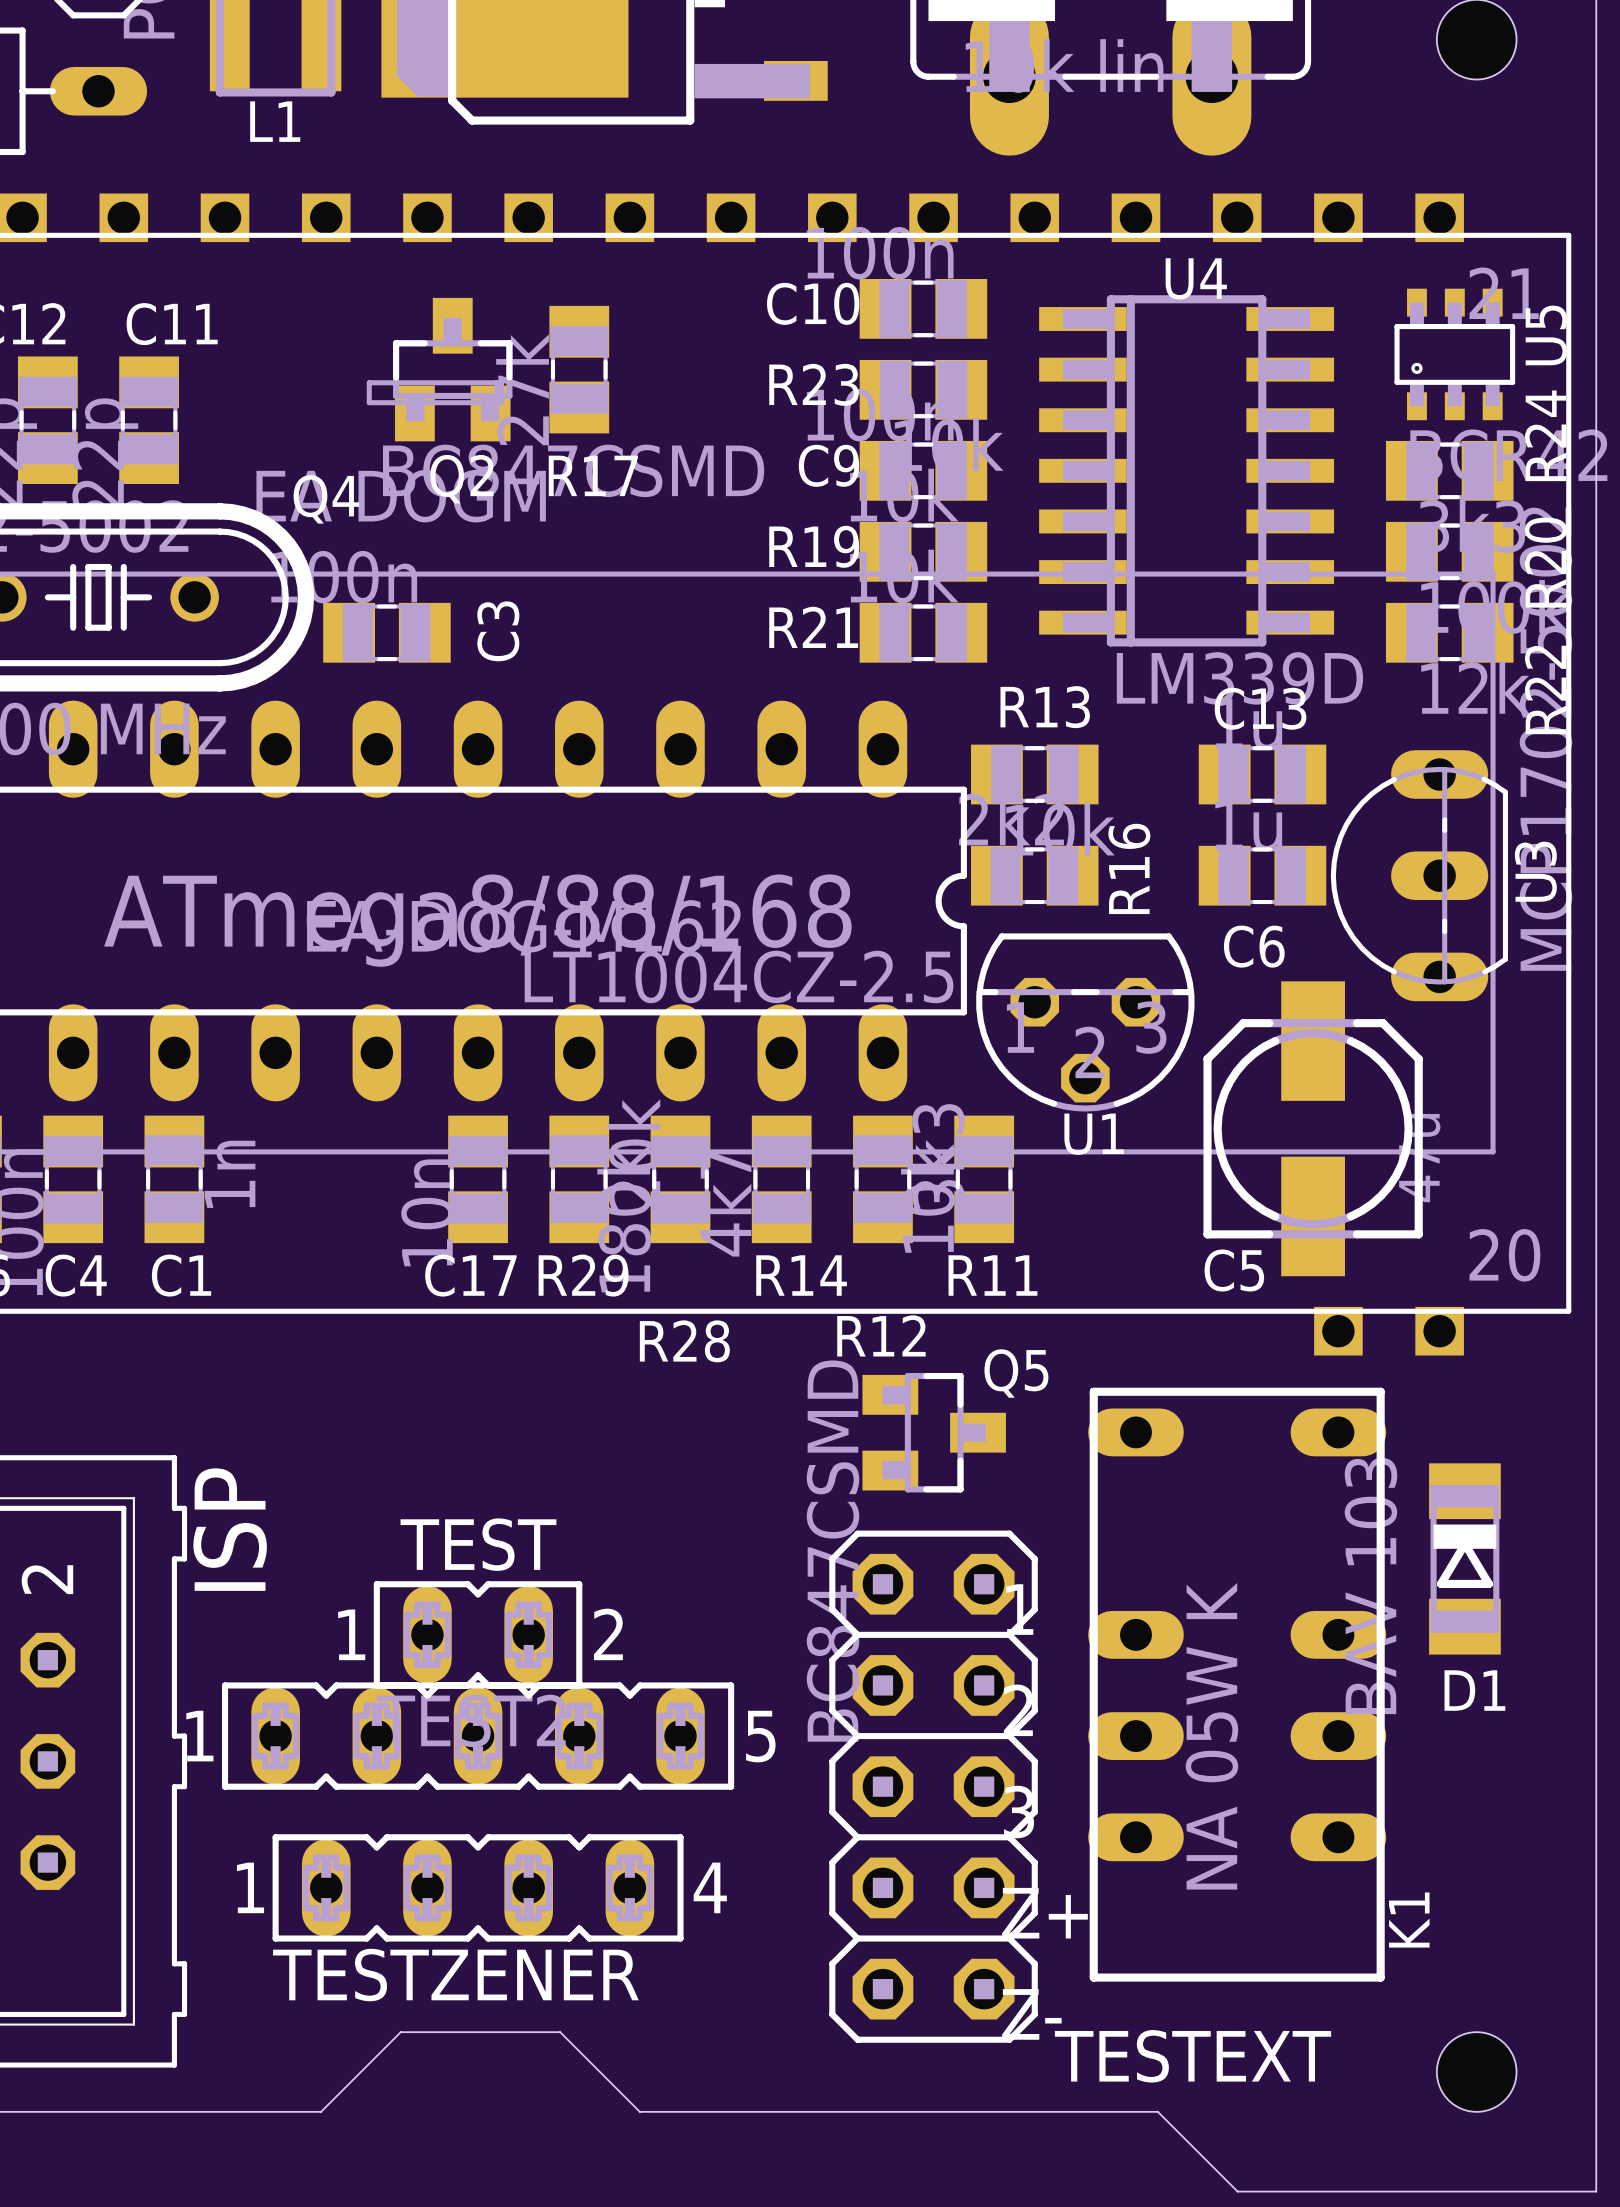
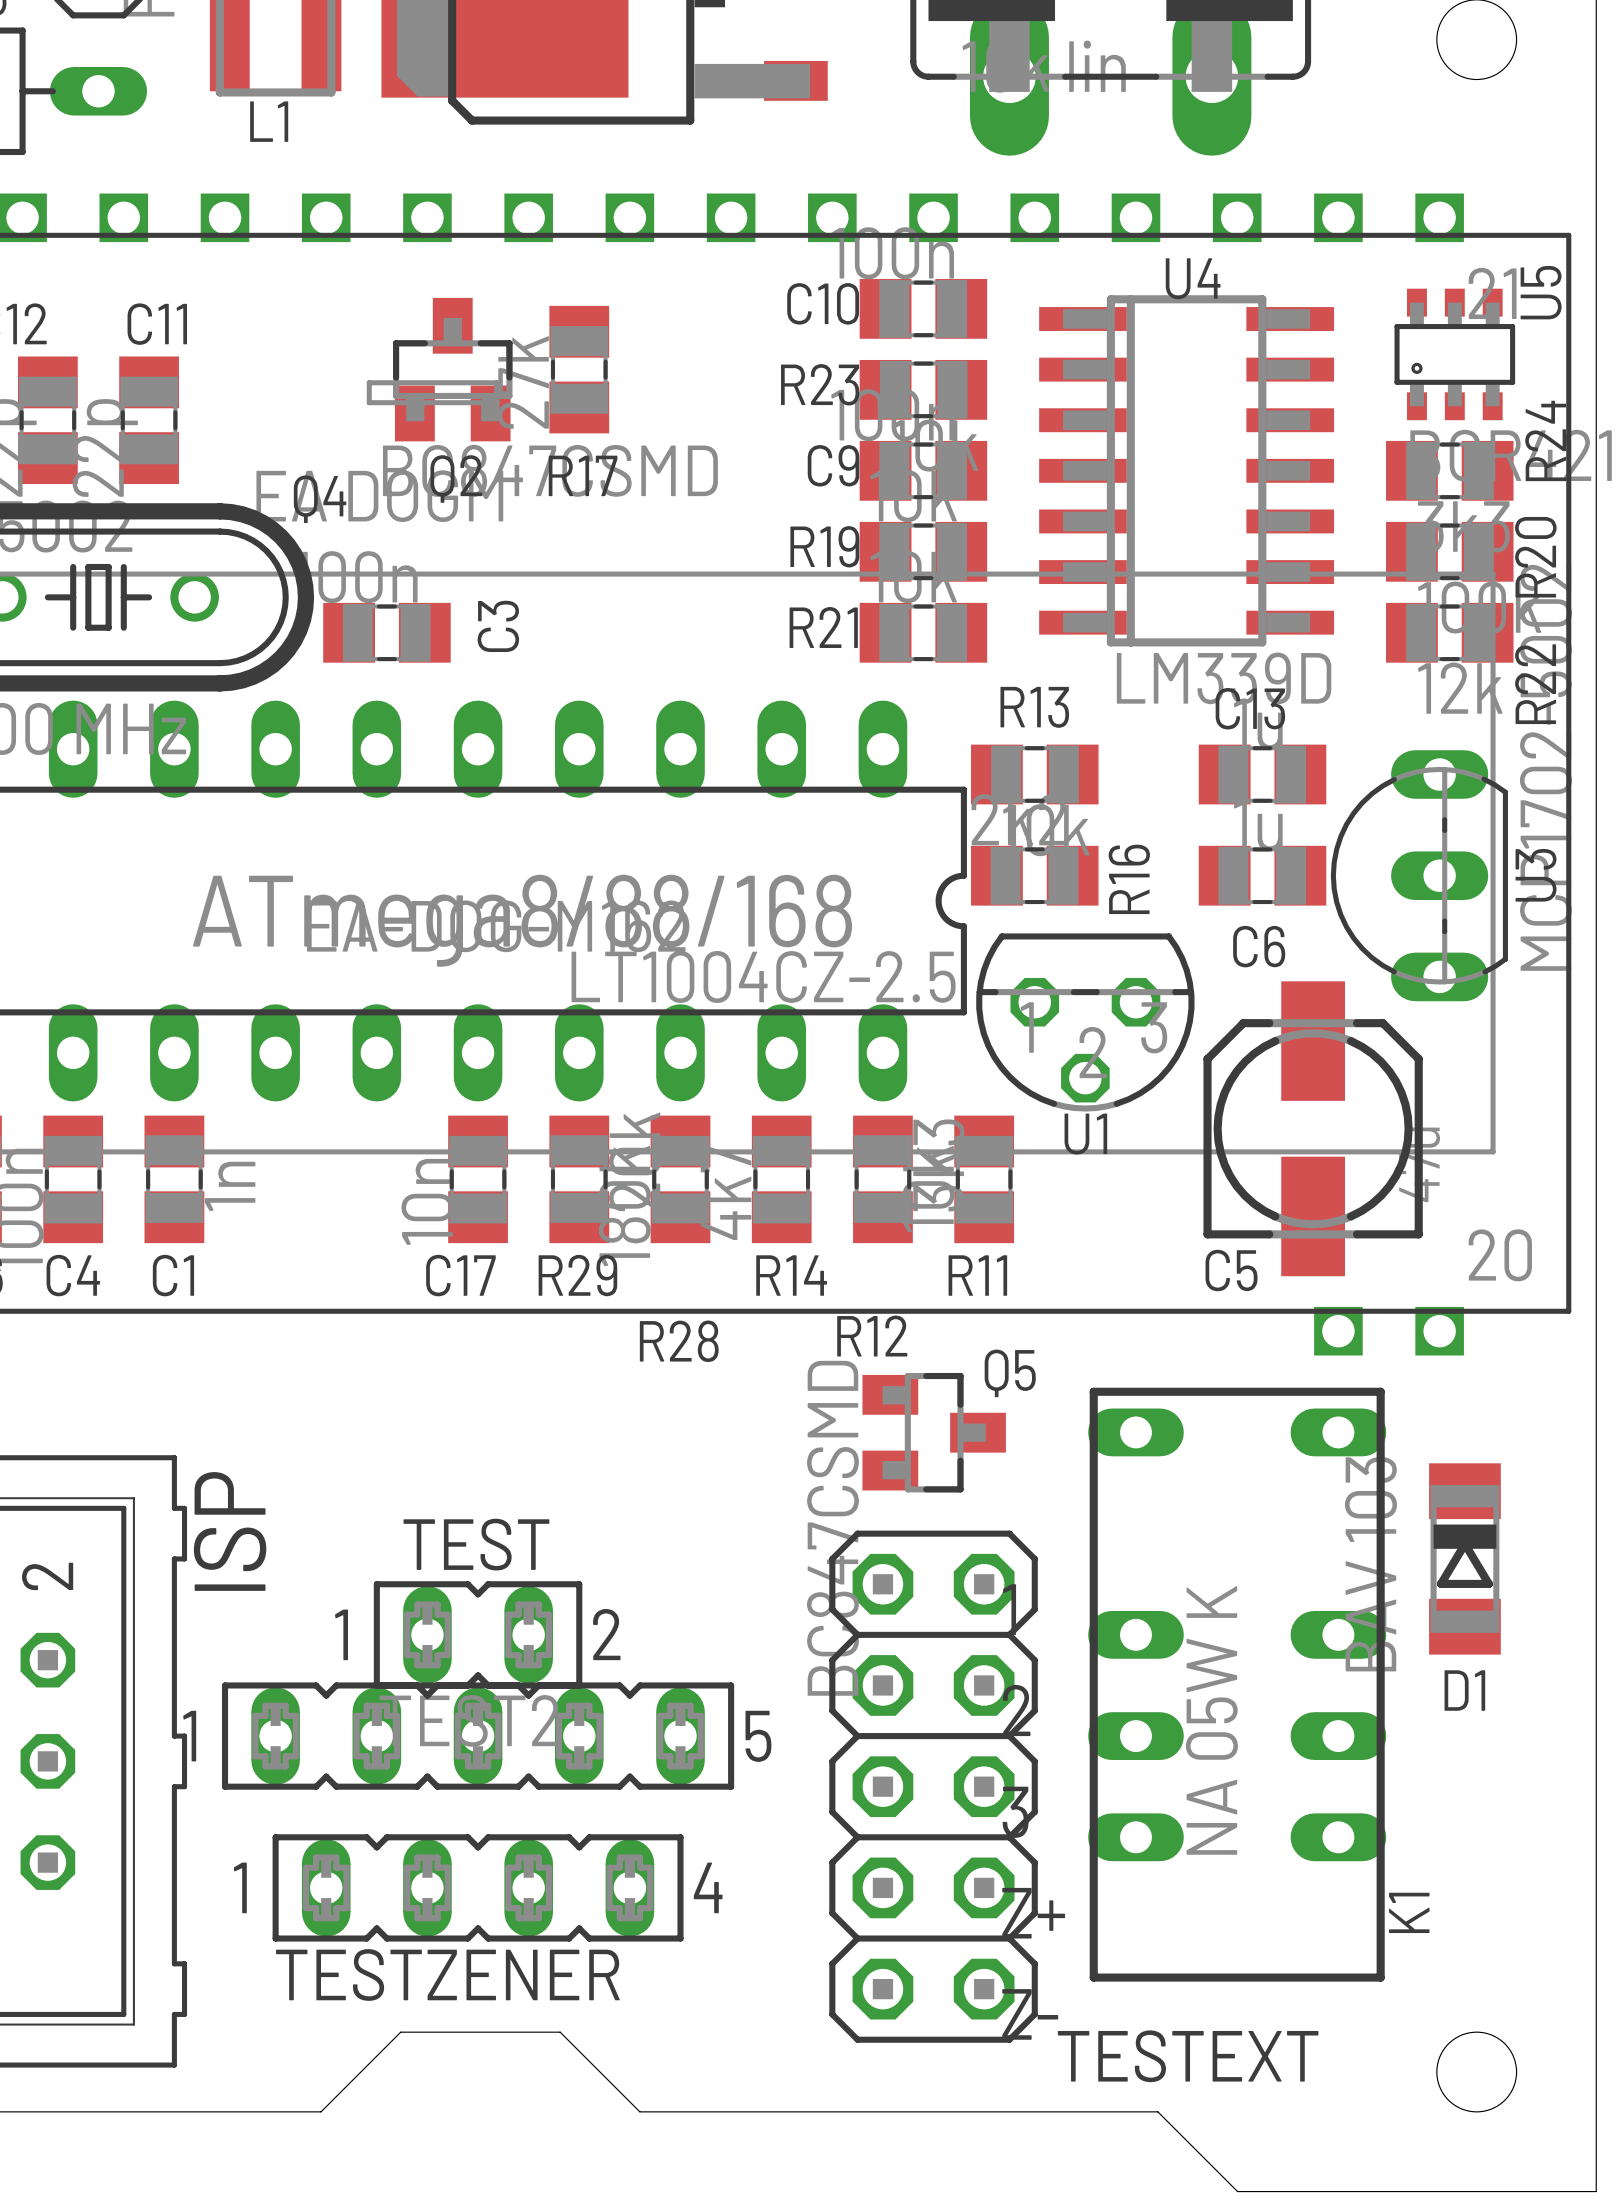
U5 name position: U5 (1546, 335) -> U5 (1541, 292)
R20 name position: R20 (1545, 562) -> R20 (1535, 557)
R22 name position: R22 (1545, 689) -> R22 (1535, 684)

